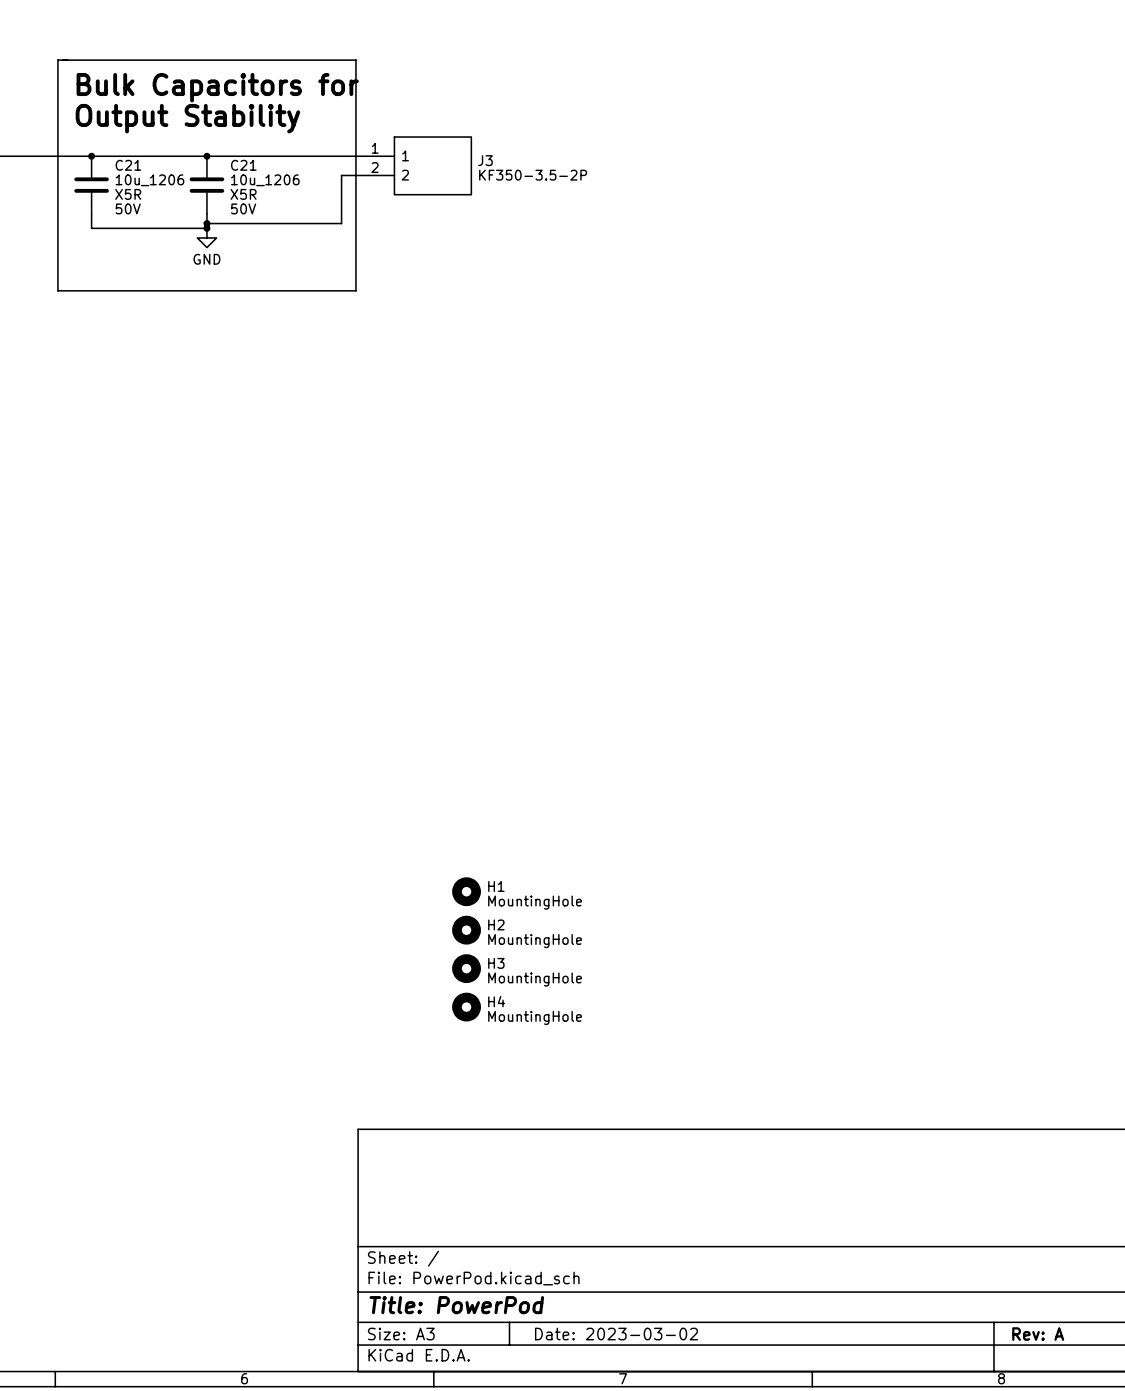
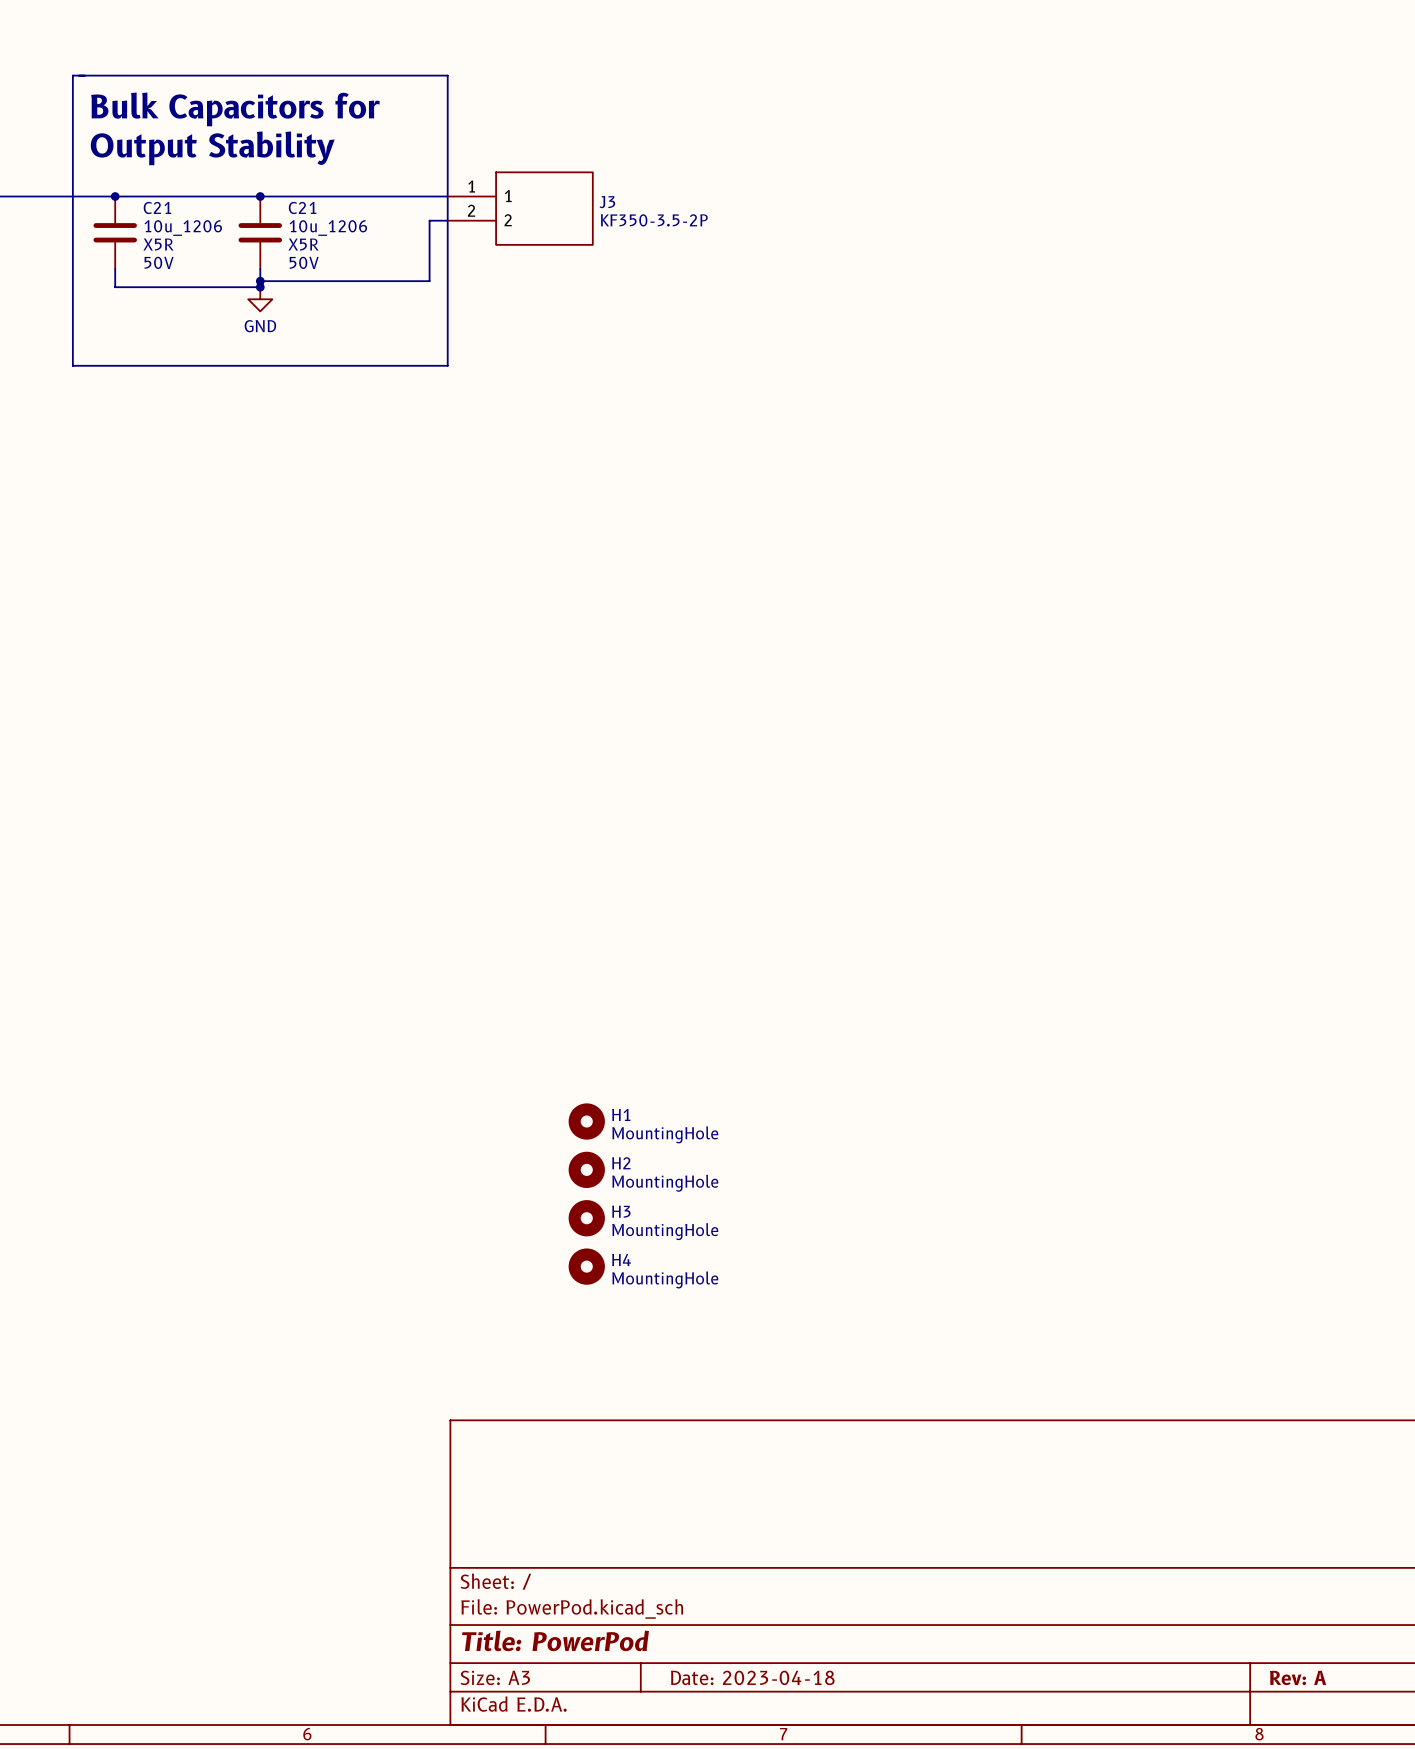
title block: Date: 2023-03-02 (616, 1334) -> Date: 2023-04-18 (752, 1677)

